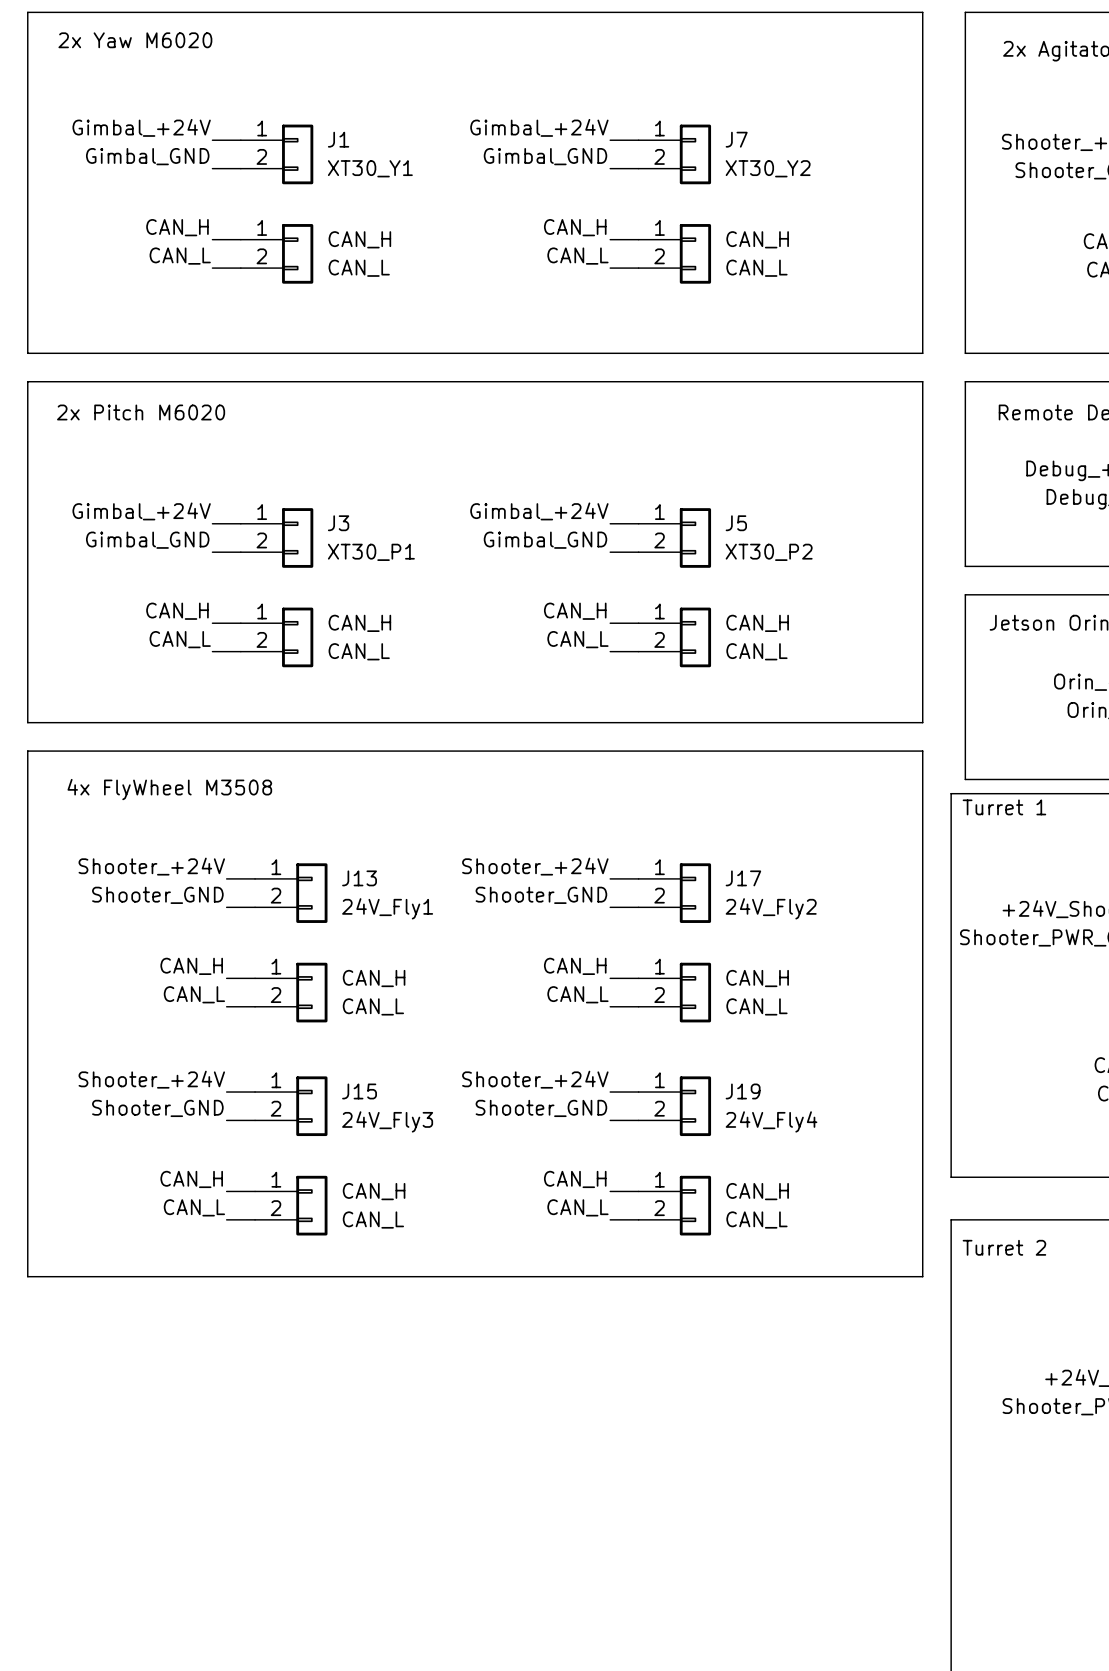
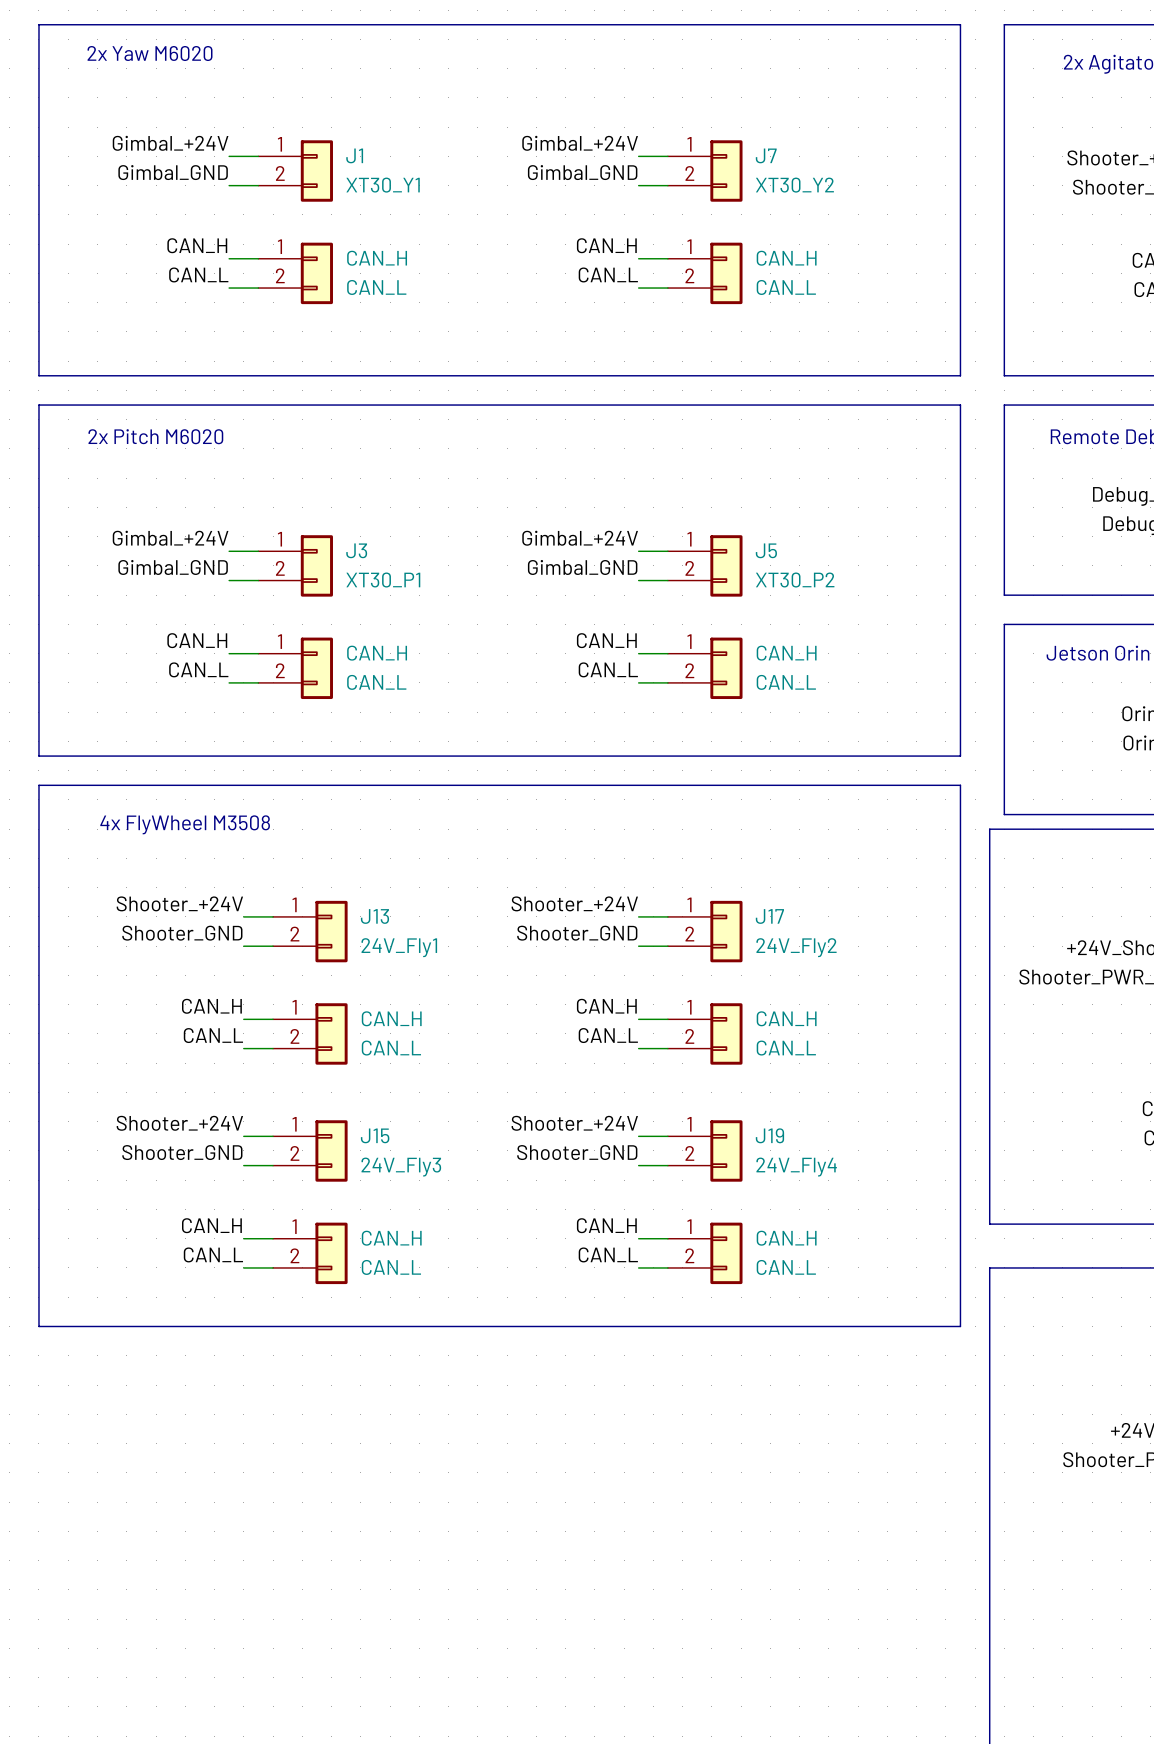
text: Turret 1 (1004, 807) -> none
text: Turret 2 (1004, 1247) -> none

